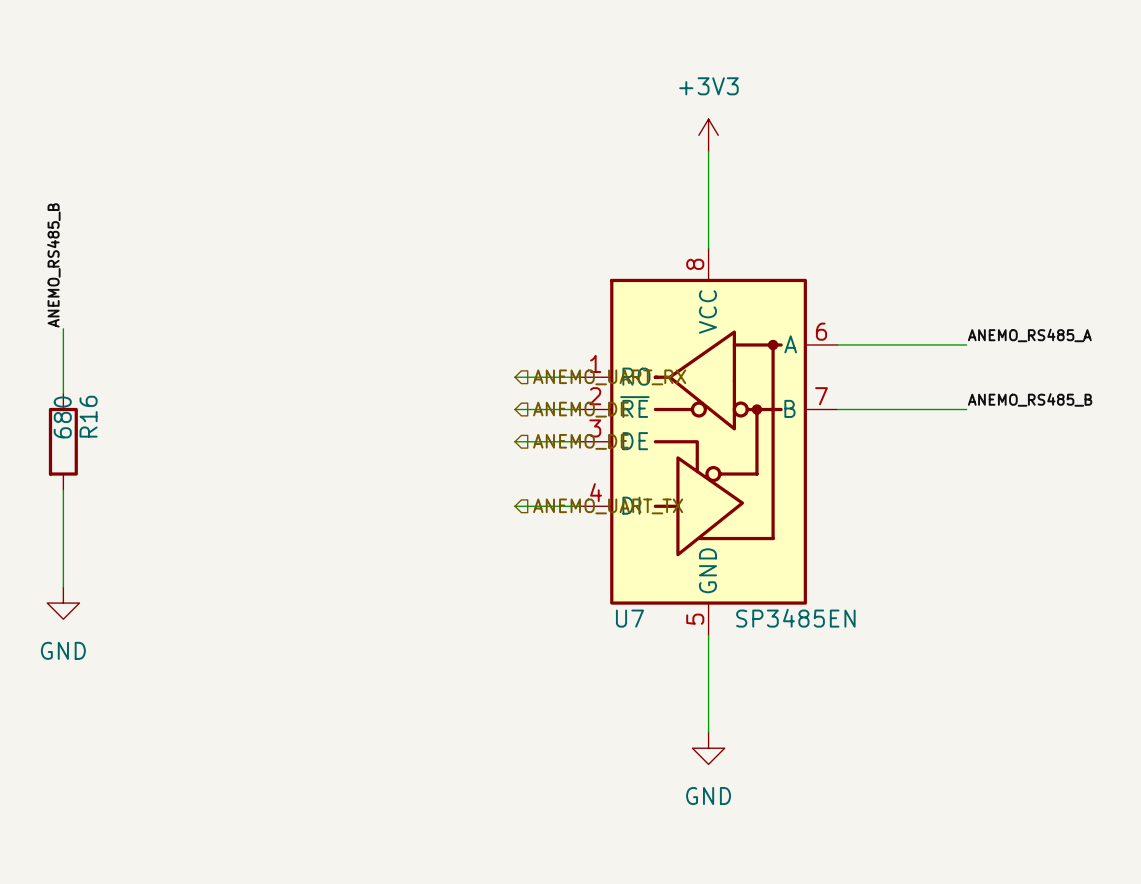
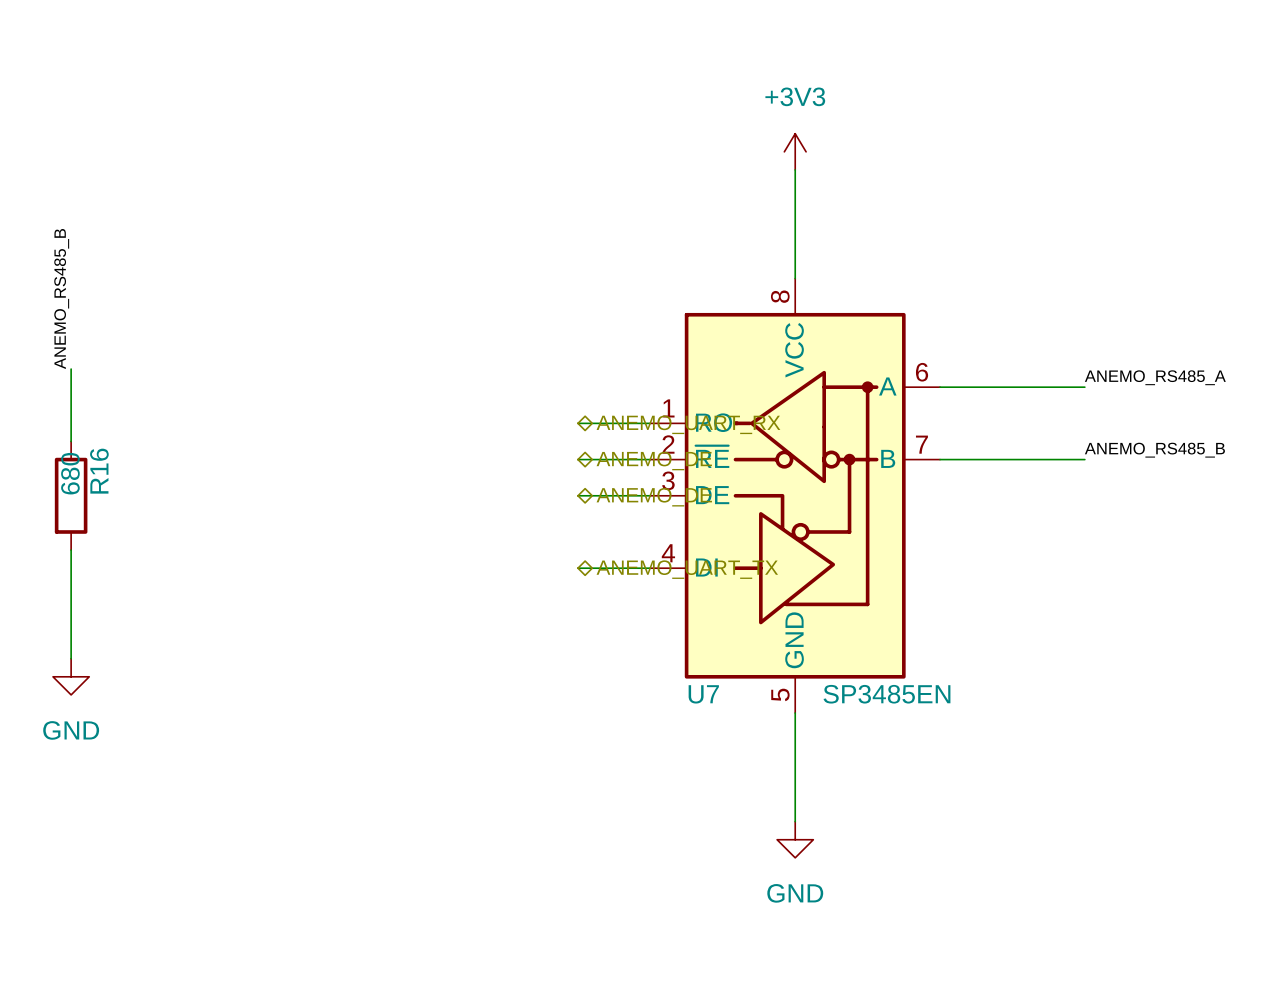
hierarchical label shape: input (609, 377) -> bidirectional (688, 424)
hierarchical label shape: input (580, 409) -> bidirectional (654, 461)
hierarchical label shape: input (580, 441) -> bidirectional (654, 497)
hierarchical label shape: input (608, 506) -> bidirectional (687, 569)

